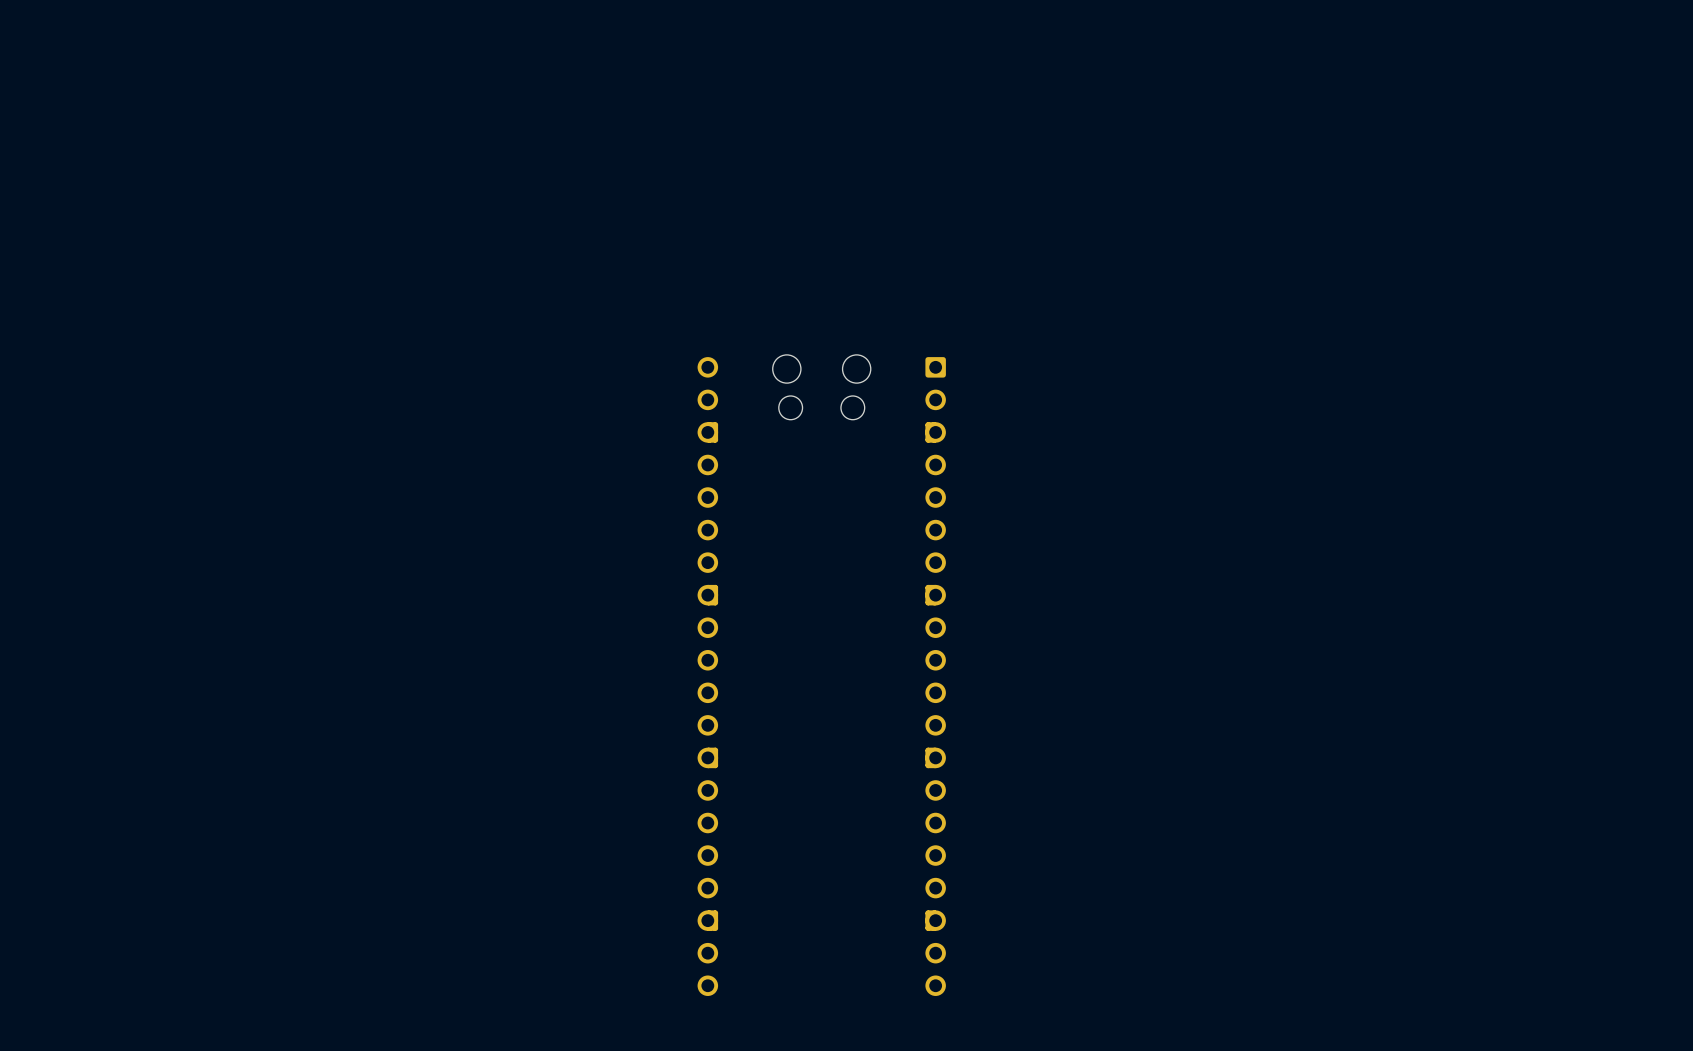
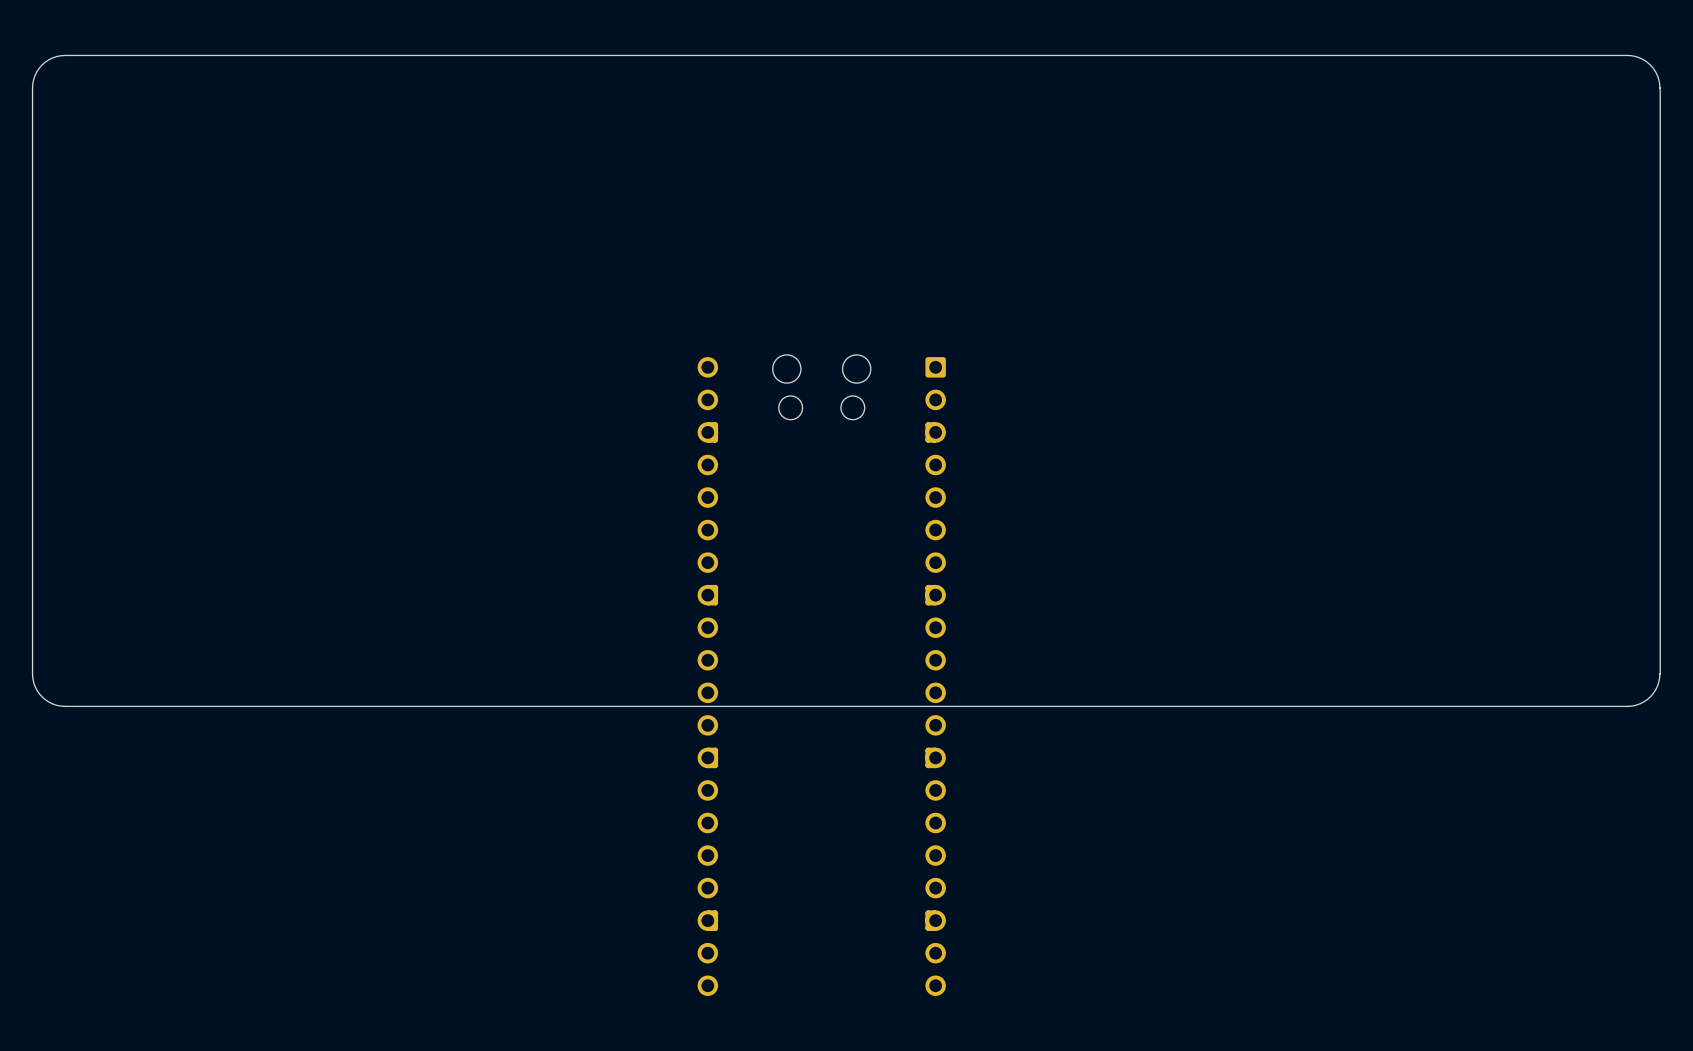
board edge: none -> (1627, 55) (65, 55) (52, 57) (39, 68) (35, 75) (32, 88) (32, 673) (35, 686) (42, 696) (48, 702) (65, 706) (1627, 706) (1639, 703) (1653, 693) (1657, 686) (1660, 673) (1660, 88) (1657, 75) (1650, 64) (1639, 57) (1627, 55)

